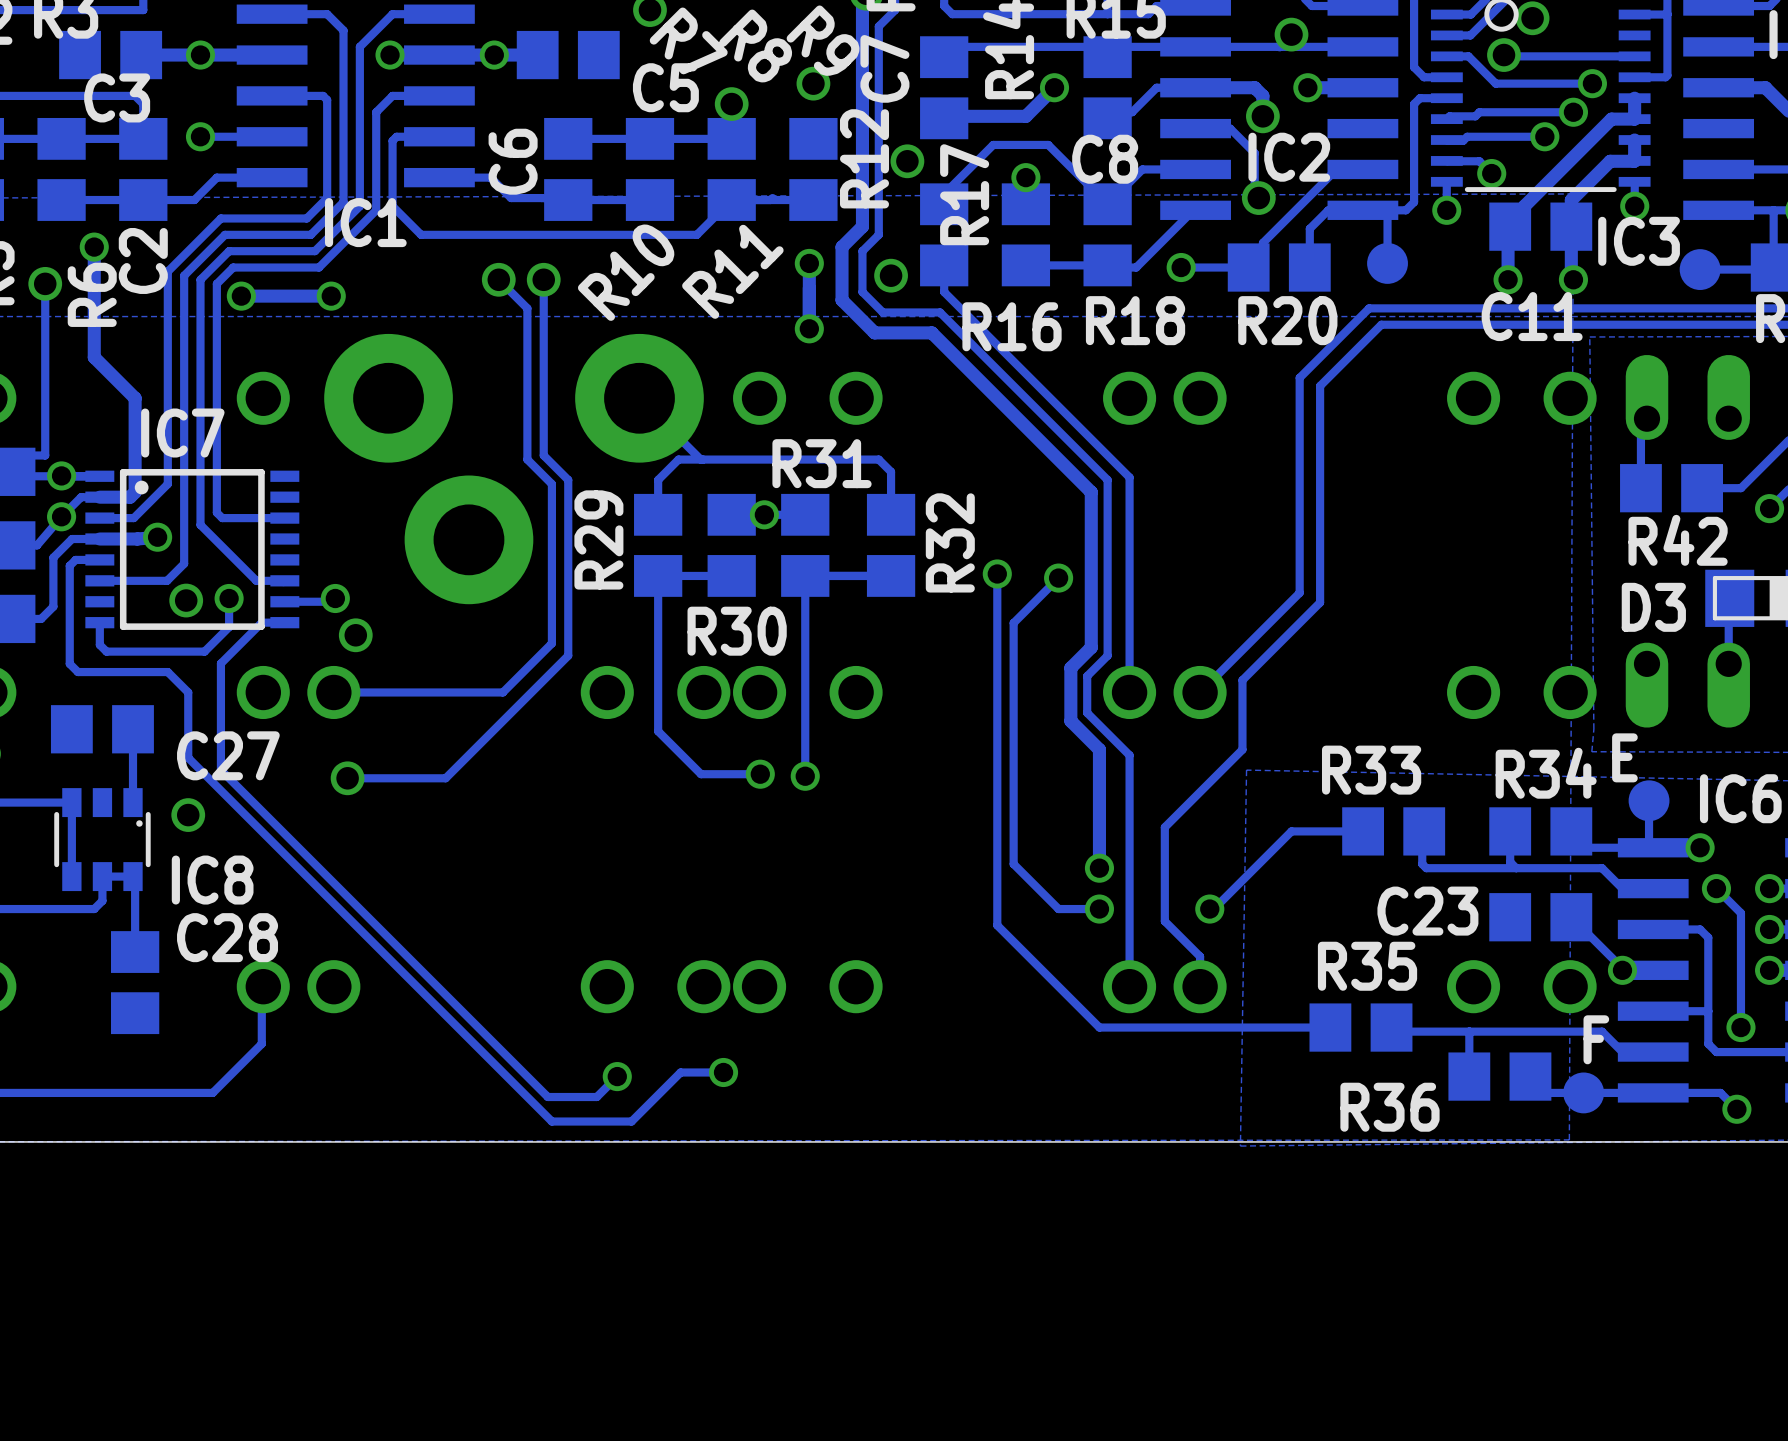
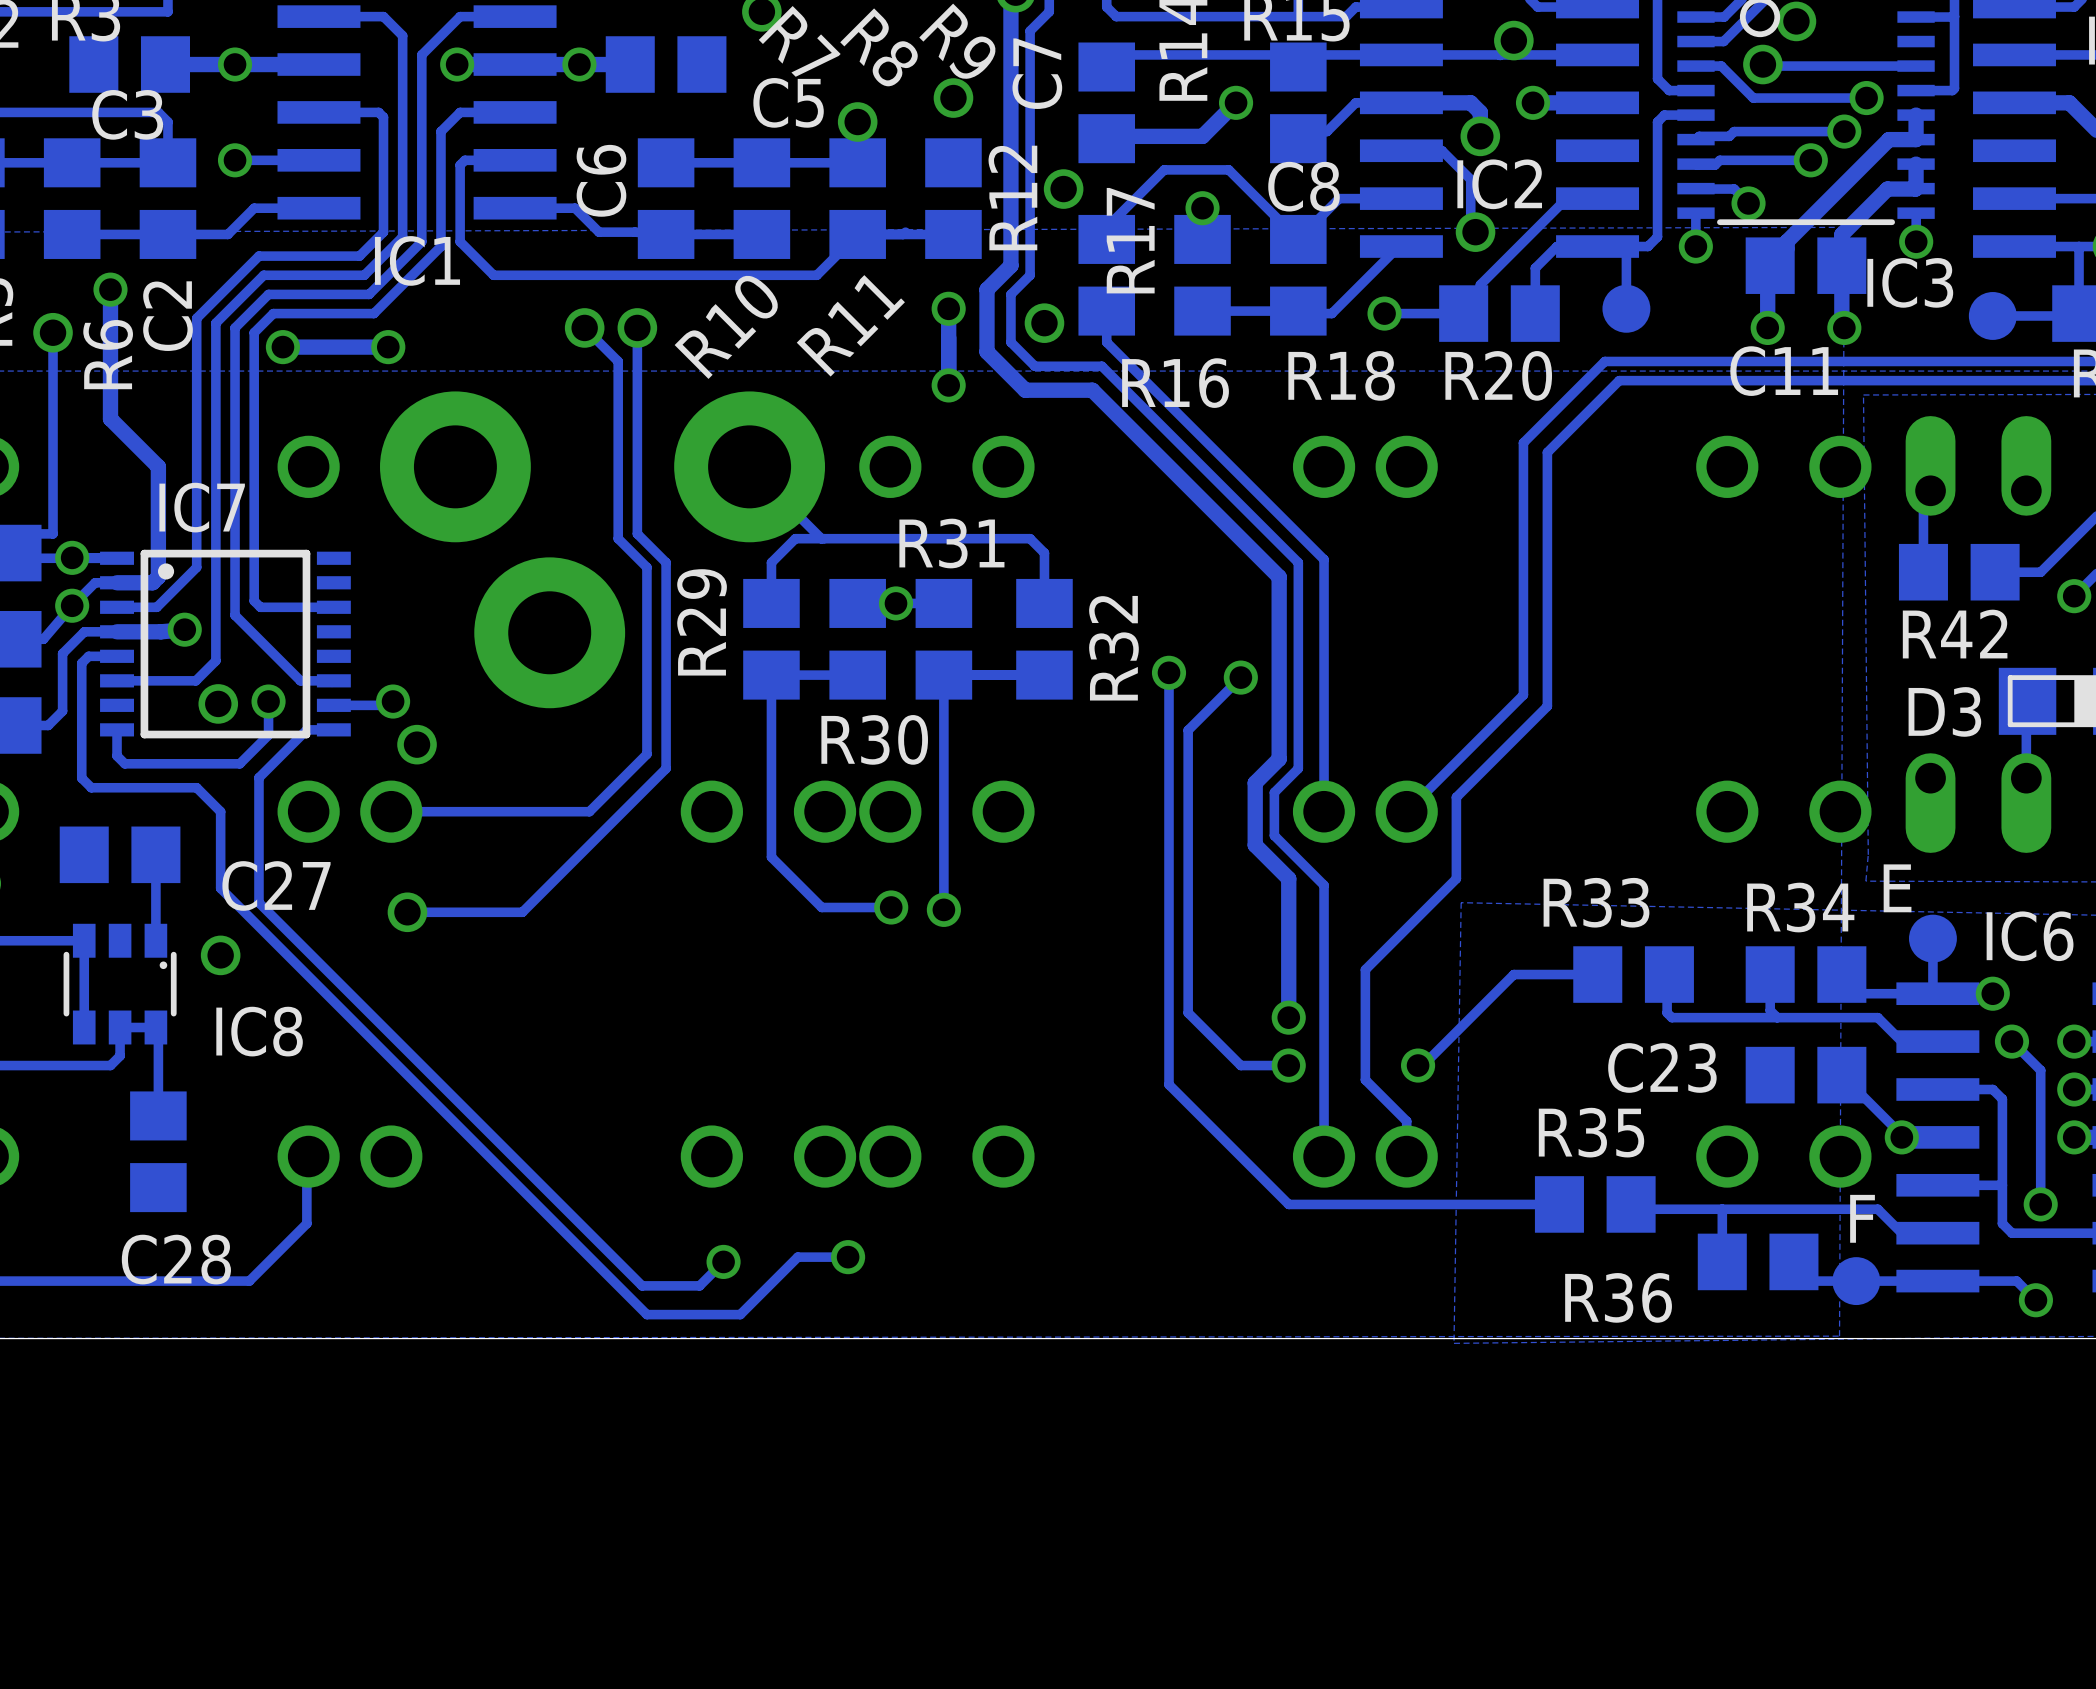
C28 name position: C28 (227, 937) -> C28 (176, 1259)

